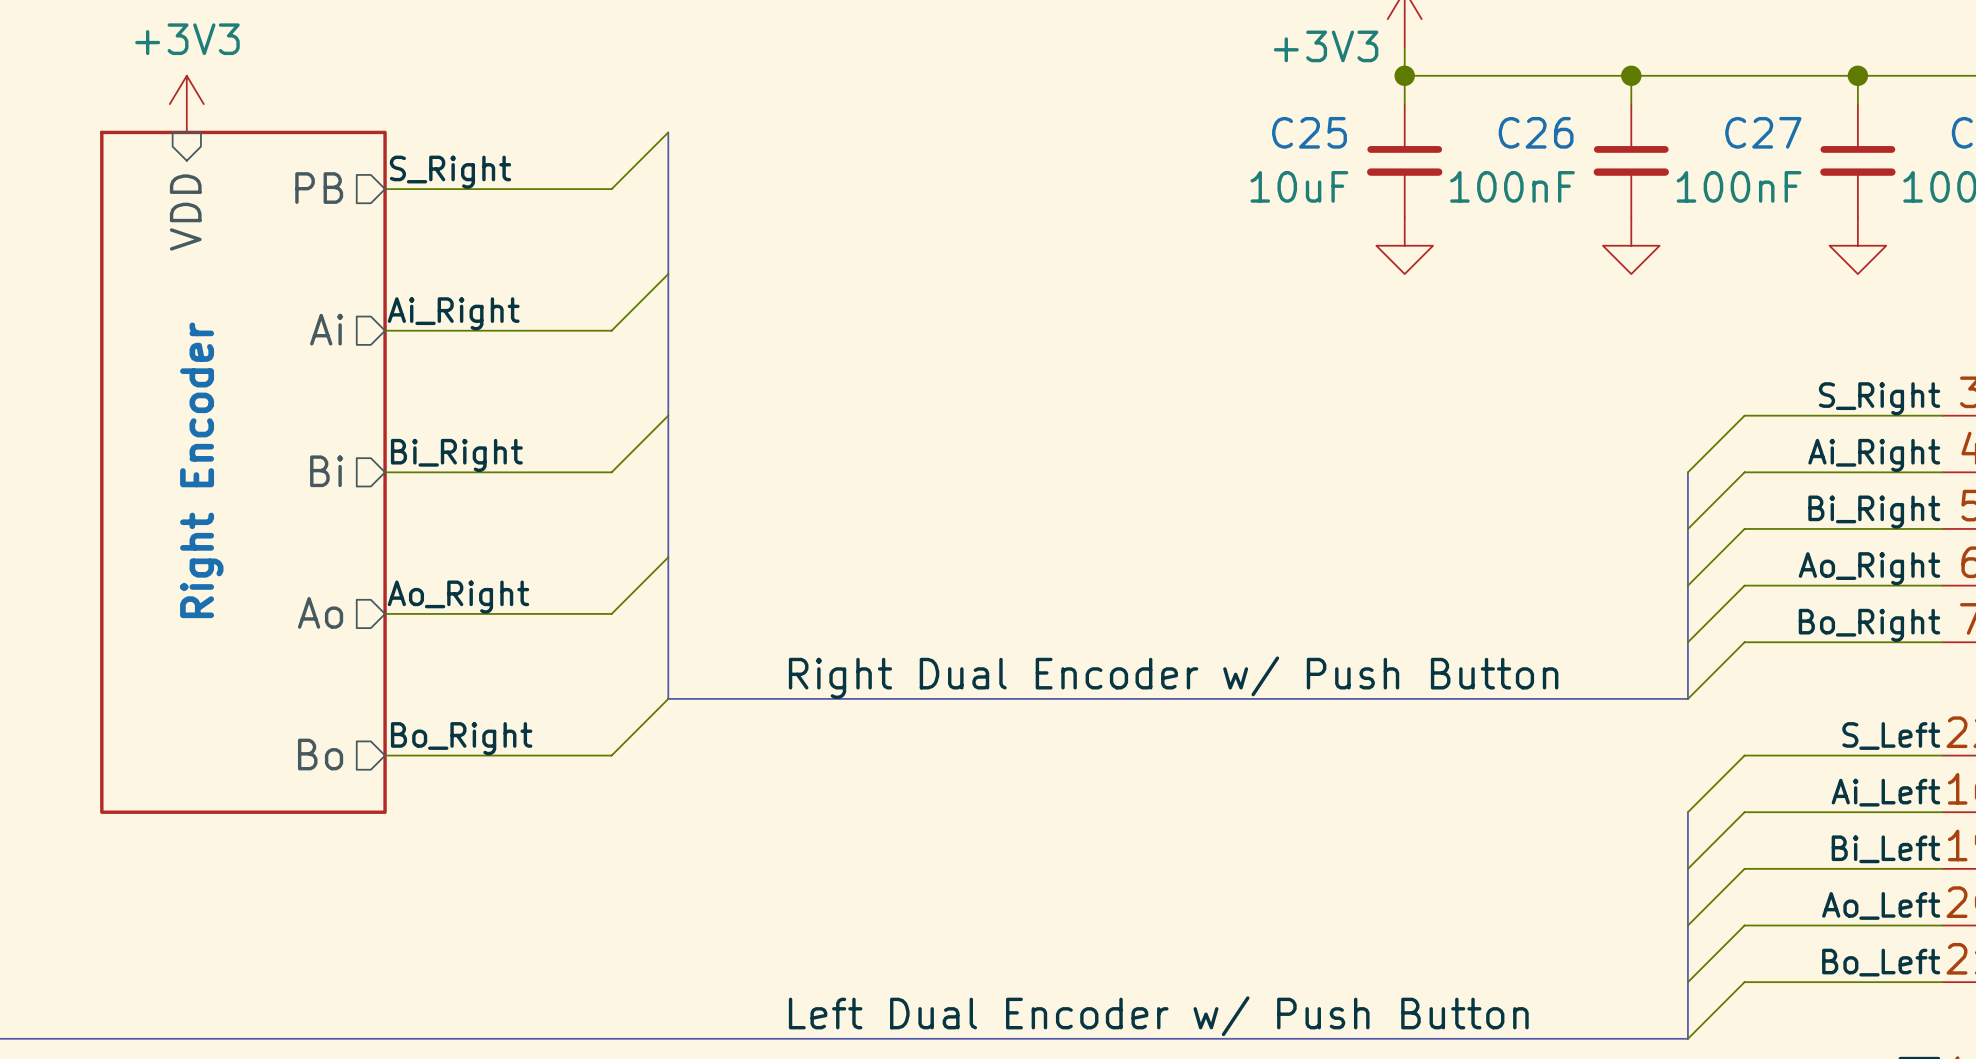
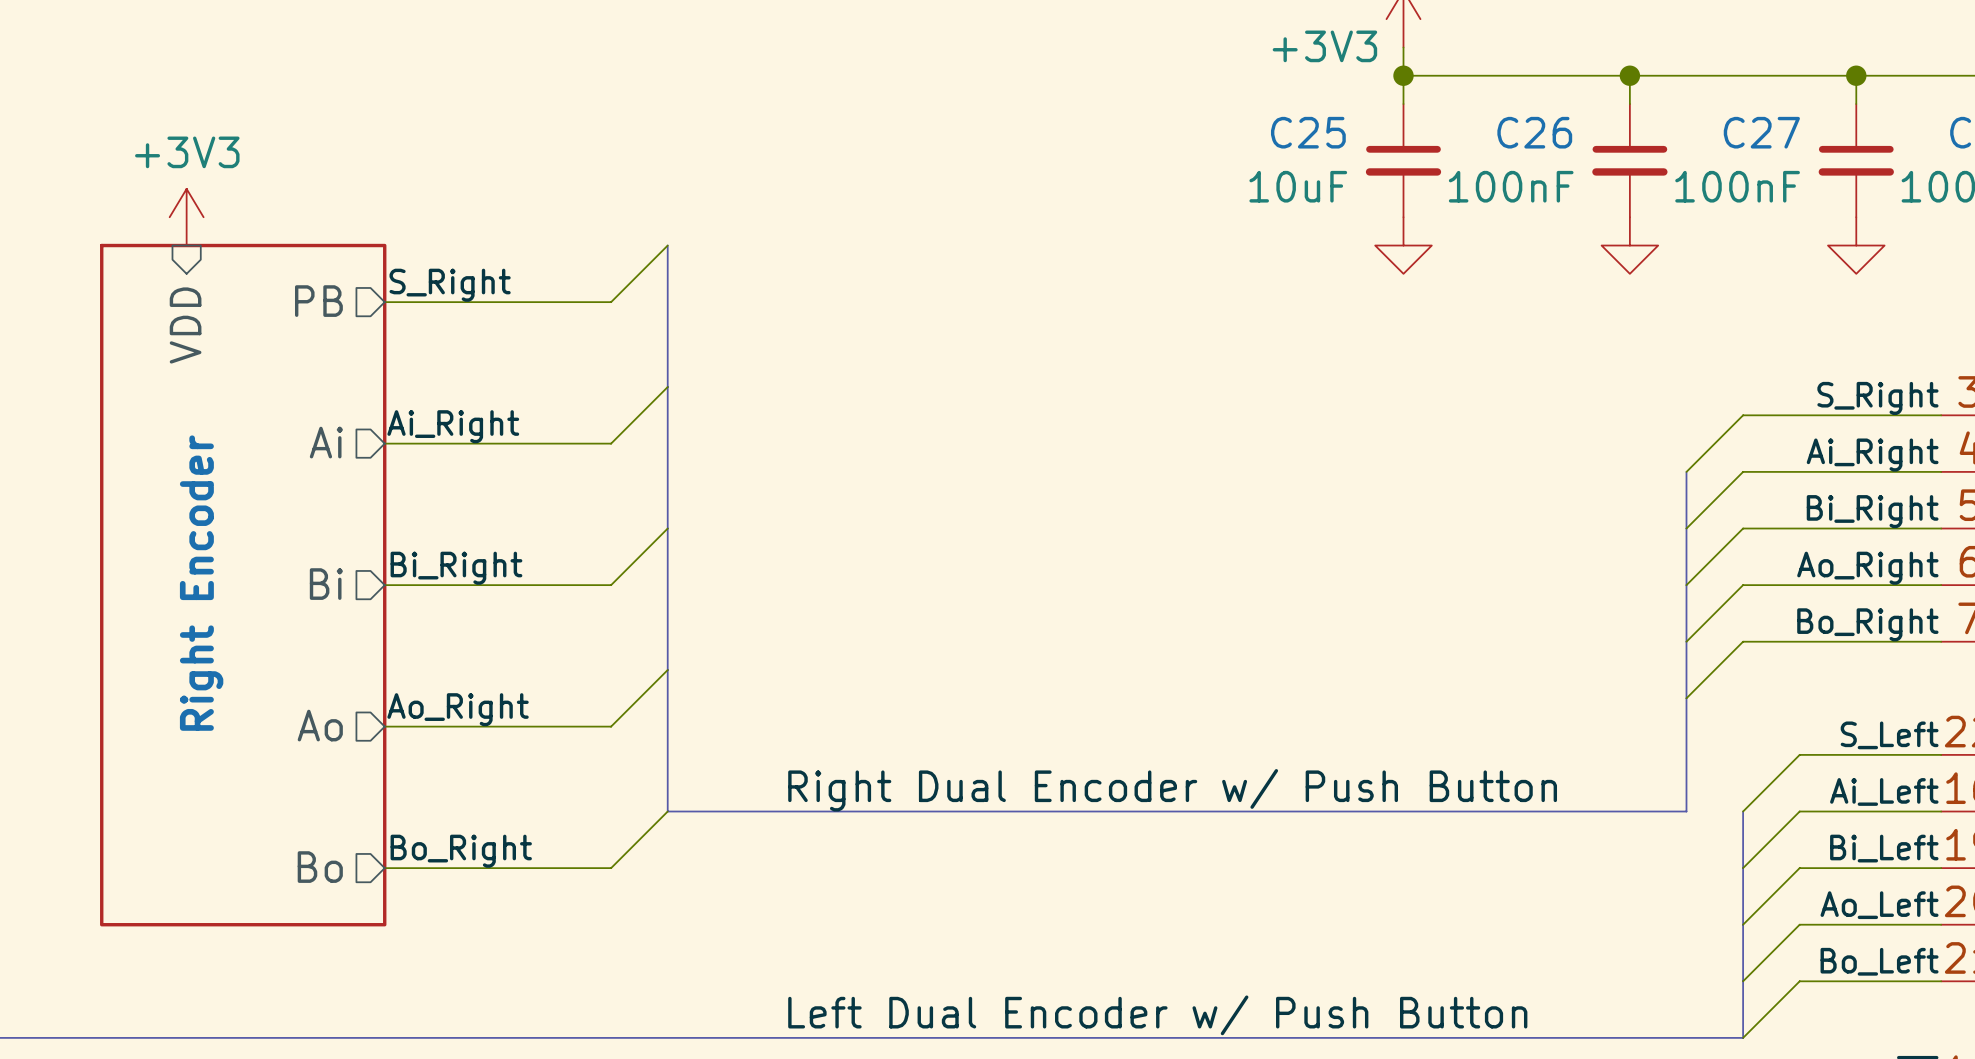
power symbol position: +3V3 (186, 104) -> +3V3 (186, 217)
wire: (668, 132) (611, 189) (385, 189) -> (667, 245) (611, 302) (384, 302)
bus: (668, 132) (668, 245) -> none
label position: S_Right (450, 172) -> S_Right (450, 285)
sheet pin position: PB (319, 188) -> PB (318, 301)
sheet pin position: VDD (185, 212) -> VDD (185, 325)
wire: (668, 274) (611, 330) (385, 330) -> (667, 387) (611, 443) (384, 443)
label position: Ai_Right (453, 313) -> Ai_Right (453, 426)
sheet pin position: Ai (326, 329) -> Ai (326, 442)
wire: (668, 415) (611, 472) (385, 472) -> (667, 528) (611, 585) (384, 585)
label position: Bi_Right (456, 455) -> Bi_Right (456, 568)
sheet pin position: Bi (326, 471) -> Bi (326, 584)
sheet Right Encoder position: (243, 472) -> (243, 585)
wire: (668, 557) (611, 613) (385, 613) -> (667, 670) (611, 726) (384, 726)
label position: Ao_Right (458, 597) -> Ao_Right (458, 709)
sheet pin position: Ao (320, 612) -> Ao (320, 725)
label position: Right Dual Encoder w/ Push Button (1173, 677) -> Right Dual Encoder w/ Push Button (1172, 790)
wire: (668, 698) (611, 755) (385, 755) -> (667, 811) (611, 868) (384, 868)
bus: (668, 698) (1687, 698) -> (667, 698) (667, 811) (1686, 811) (1686, 698)
label position: Bo_Right (461, 738) -> Bo_Right (461, 851)
sheet pin position: Bo (320, 754) -> Bo (320, 867)
wire: (1801, 755) (1744, 755) (1687, 812) -> (1799, 754) (1743, 811)
bus: (1687, 812) (1687, 1038) -> (1743, 811) (1743, 1037) (1686, 1037)
wire: (1801, 812) (1744, 812) (1687, 868) -> (1799, 811) (1743, 868)
wire: (1801, 868) (1744, 868) (1687, 925) -> (1799, 868) (1743, 924)
wire: (1801, 925) (1744, 925) (1687, 982) -> (1799, 924) (1743, 981)
wire: (1801, 982) (1744, 982) (1687, 1038) -> (1799, 981) (1743, 1037)

